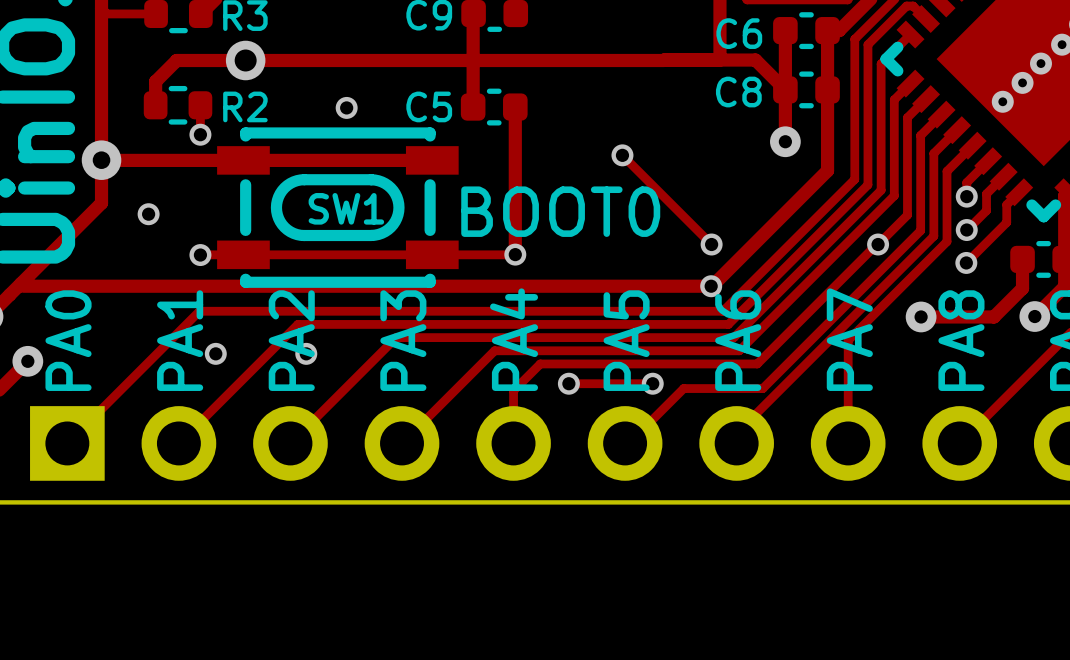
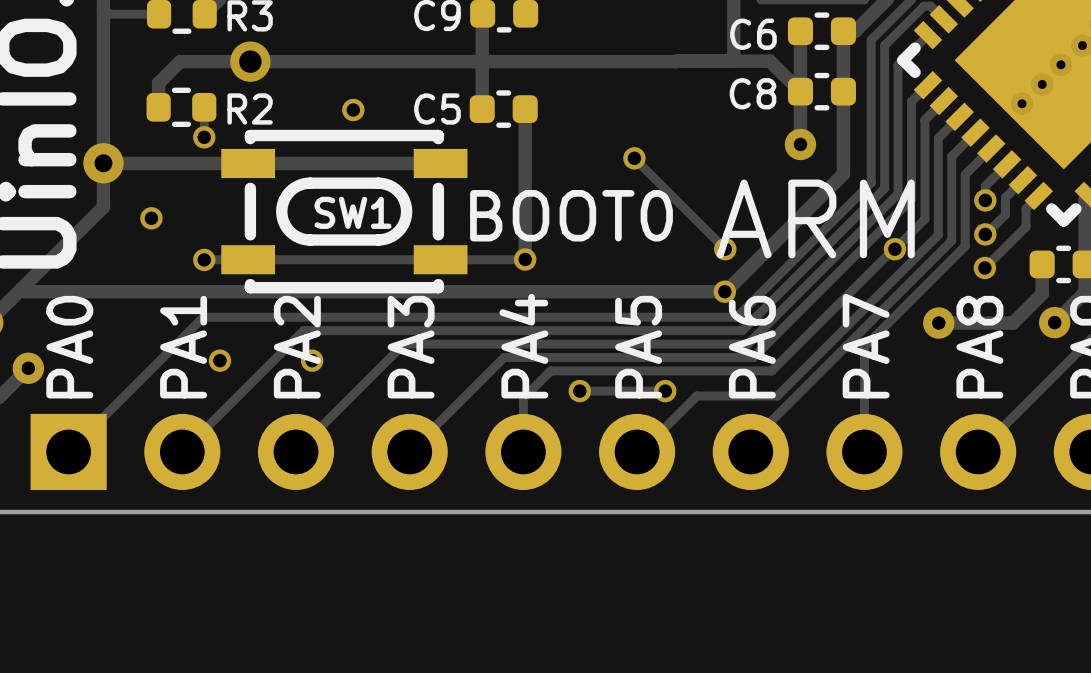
text: none -> ARM (815, 218)

